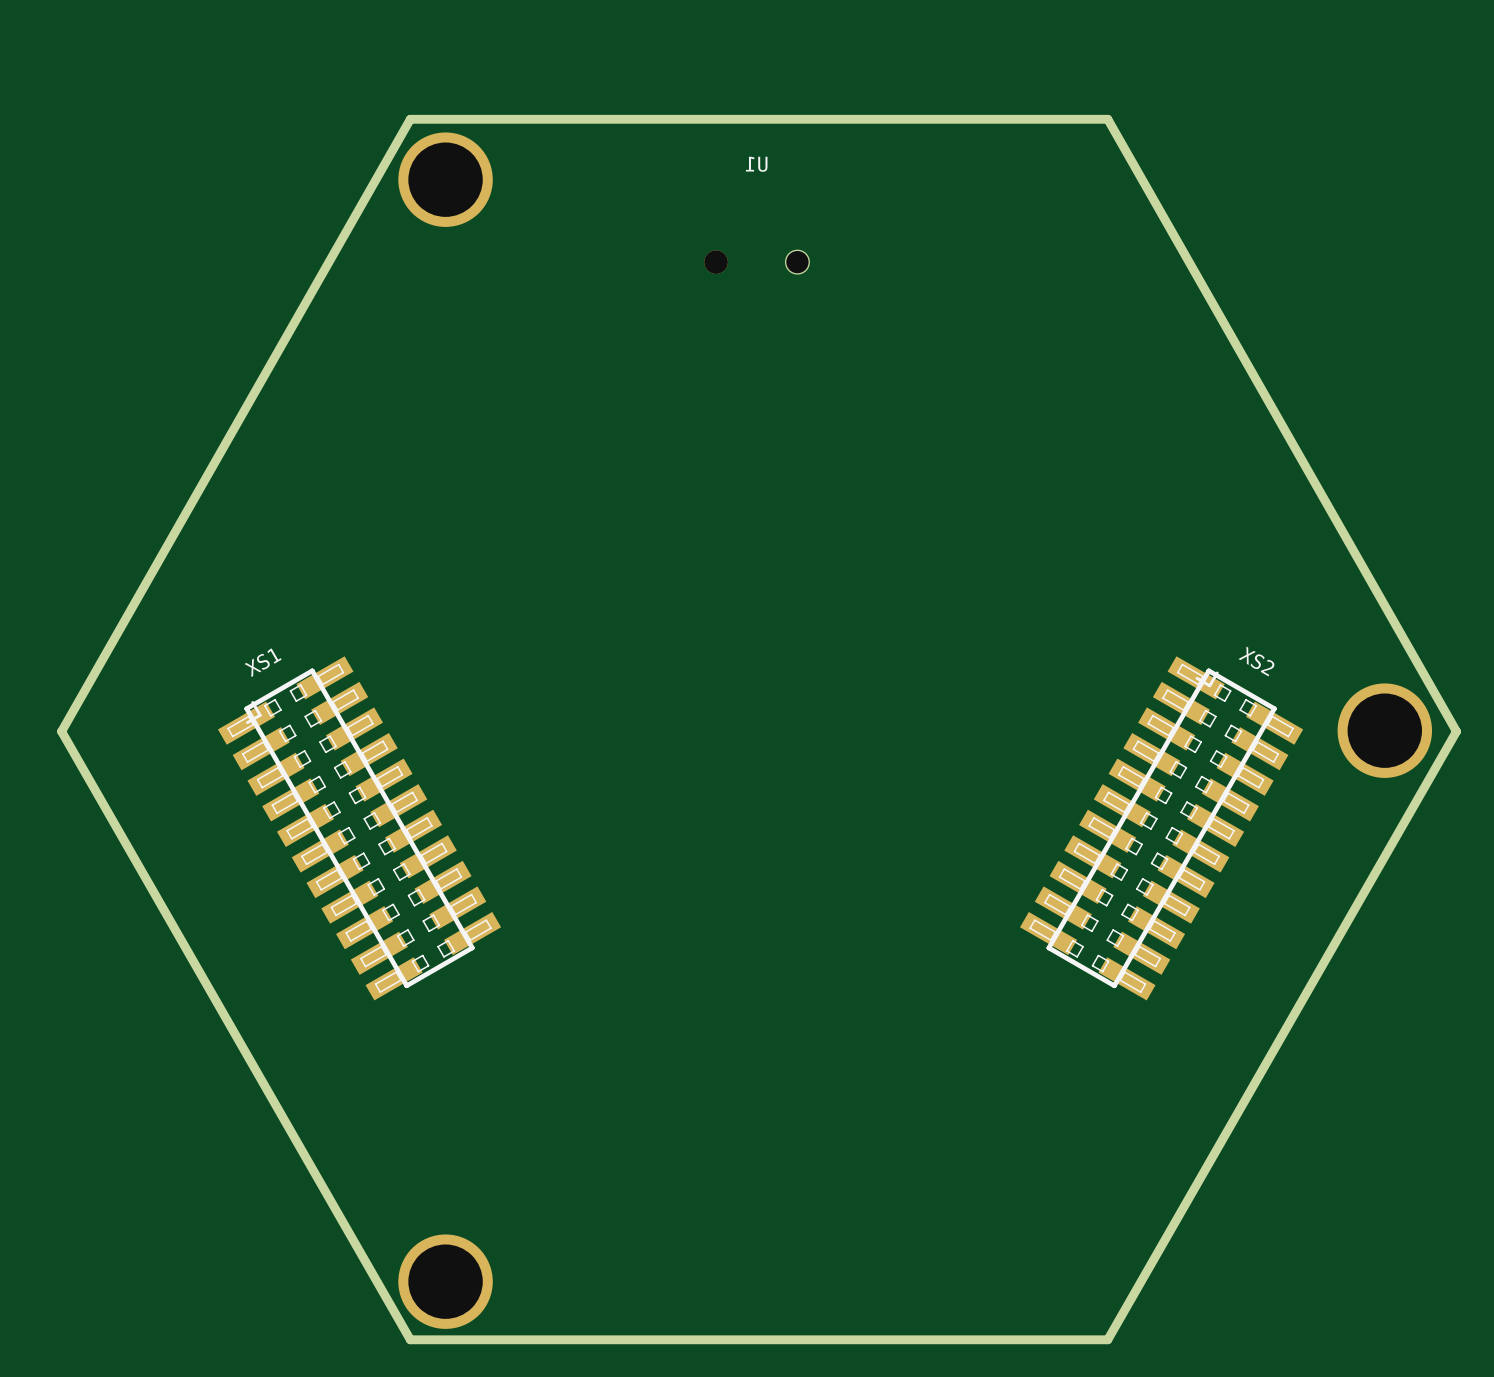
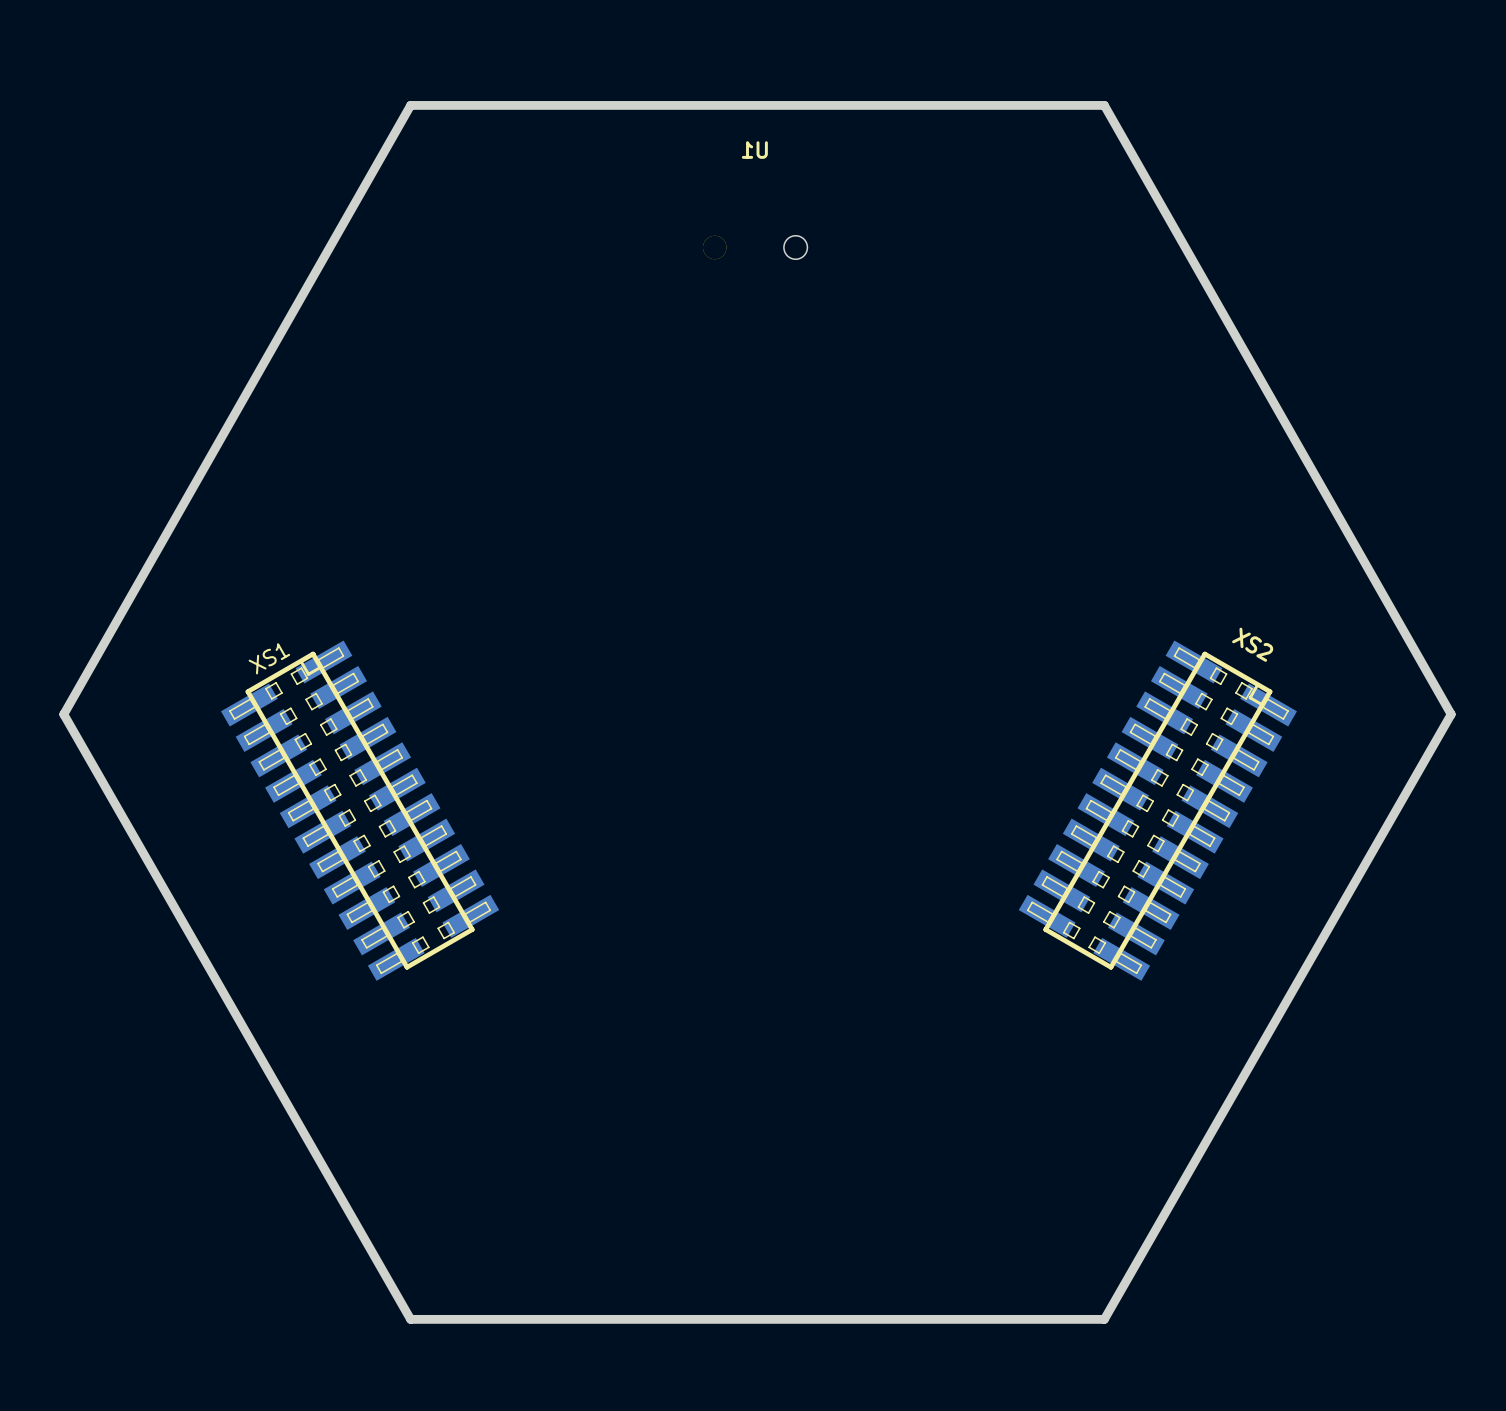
part: (445, 179) -> none
XS1 footprint: [217, 656, 502, 1001] -> [221, 640, 500, 981]
XS2 footprint: [1020, 656, 1304, 1001] -> [1018, 640, 1297, 981]
XS1 name position: XS1 (263, 662) -> XS1 (269, 658)
part: (1384, 730) -> none
part: (445, 1281) -> none

